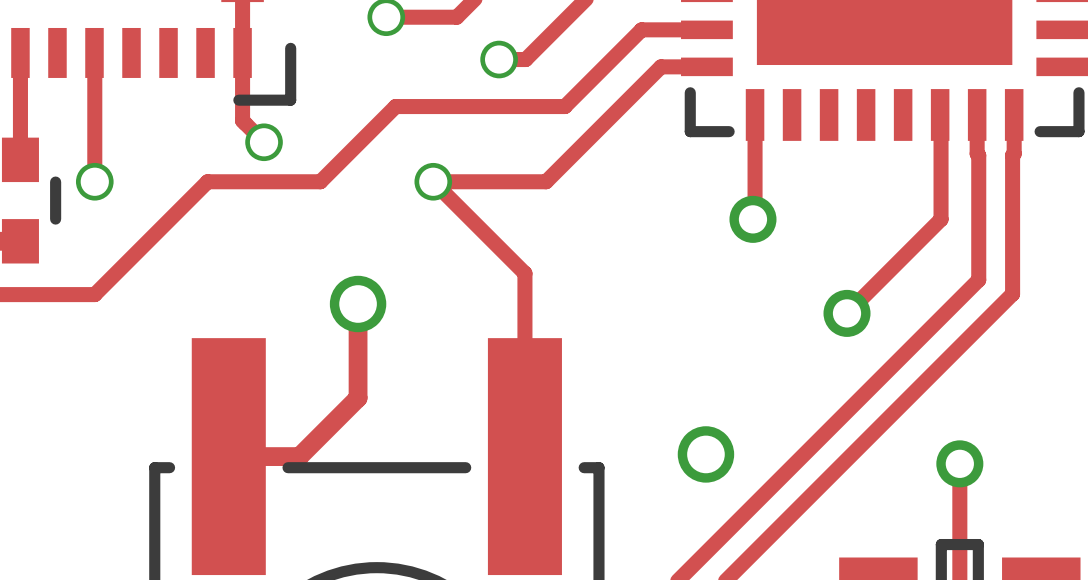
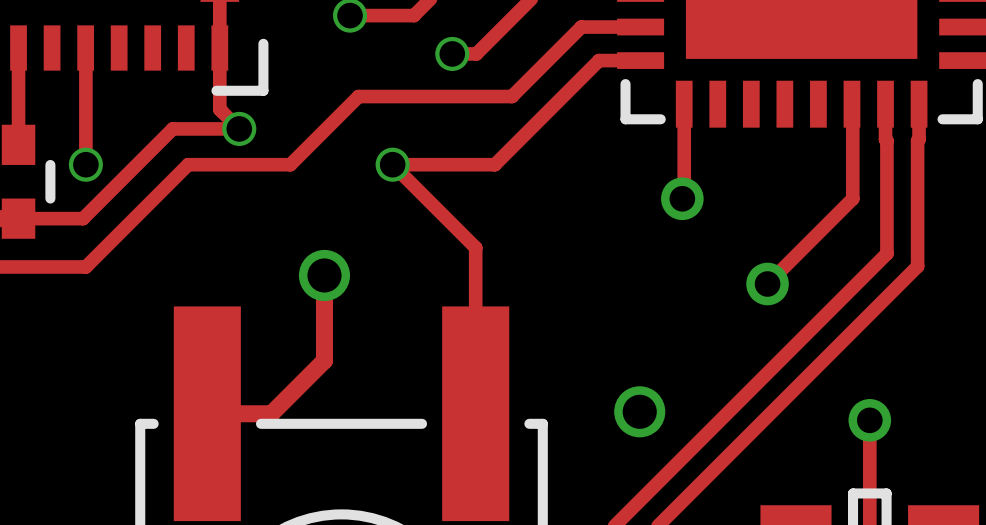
track: none -> (239, 128) (172, 128) (83, 218) (18, 218)

